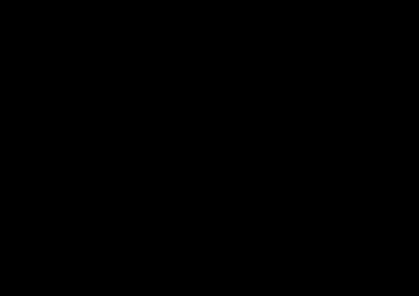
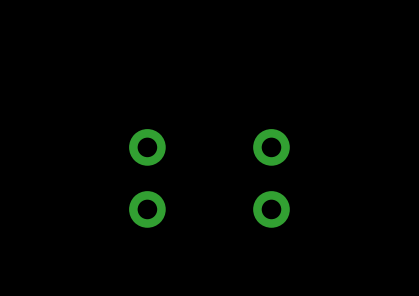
part: none -> (147, 178)
part: none -> (271, 178)

